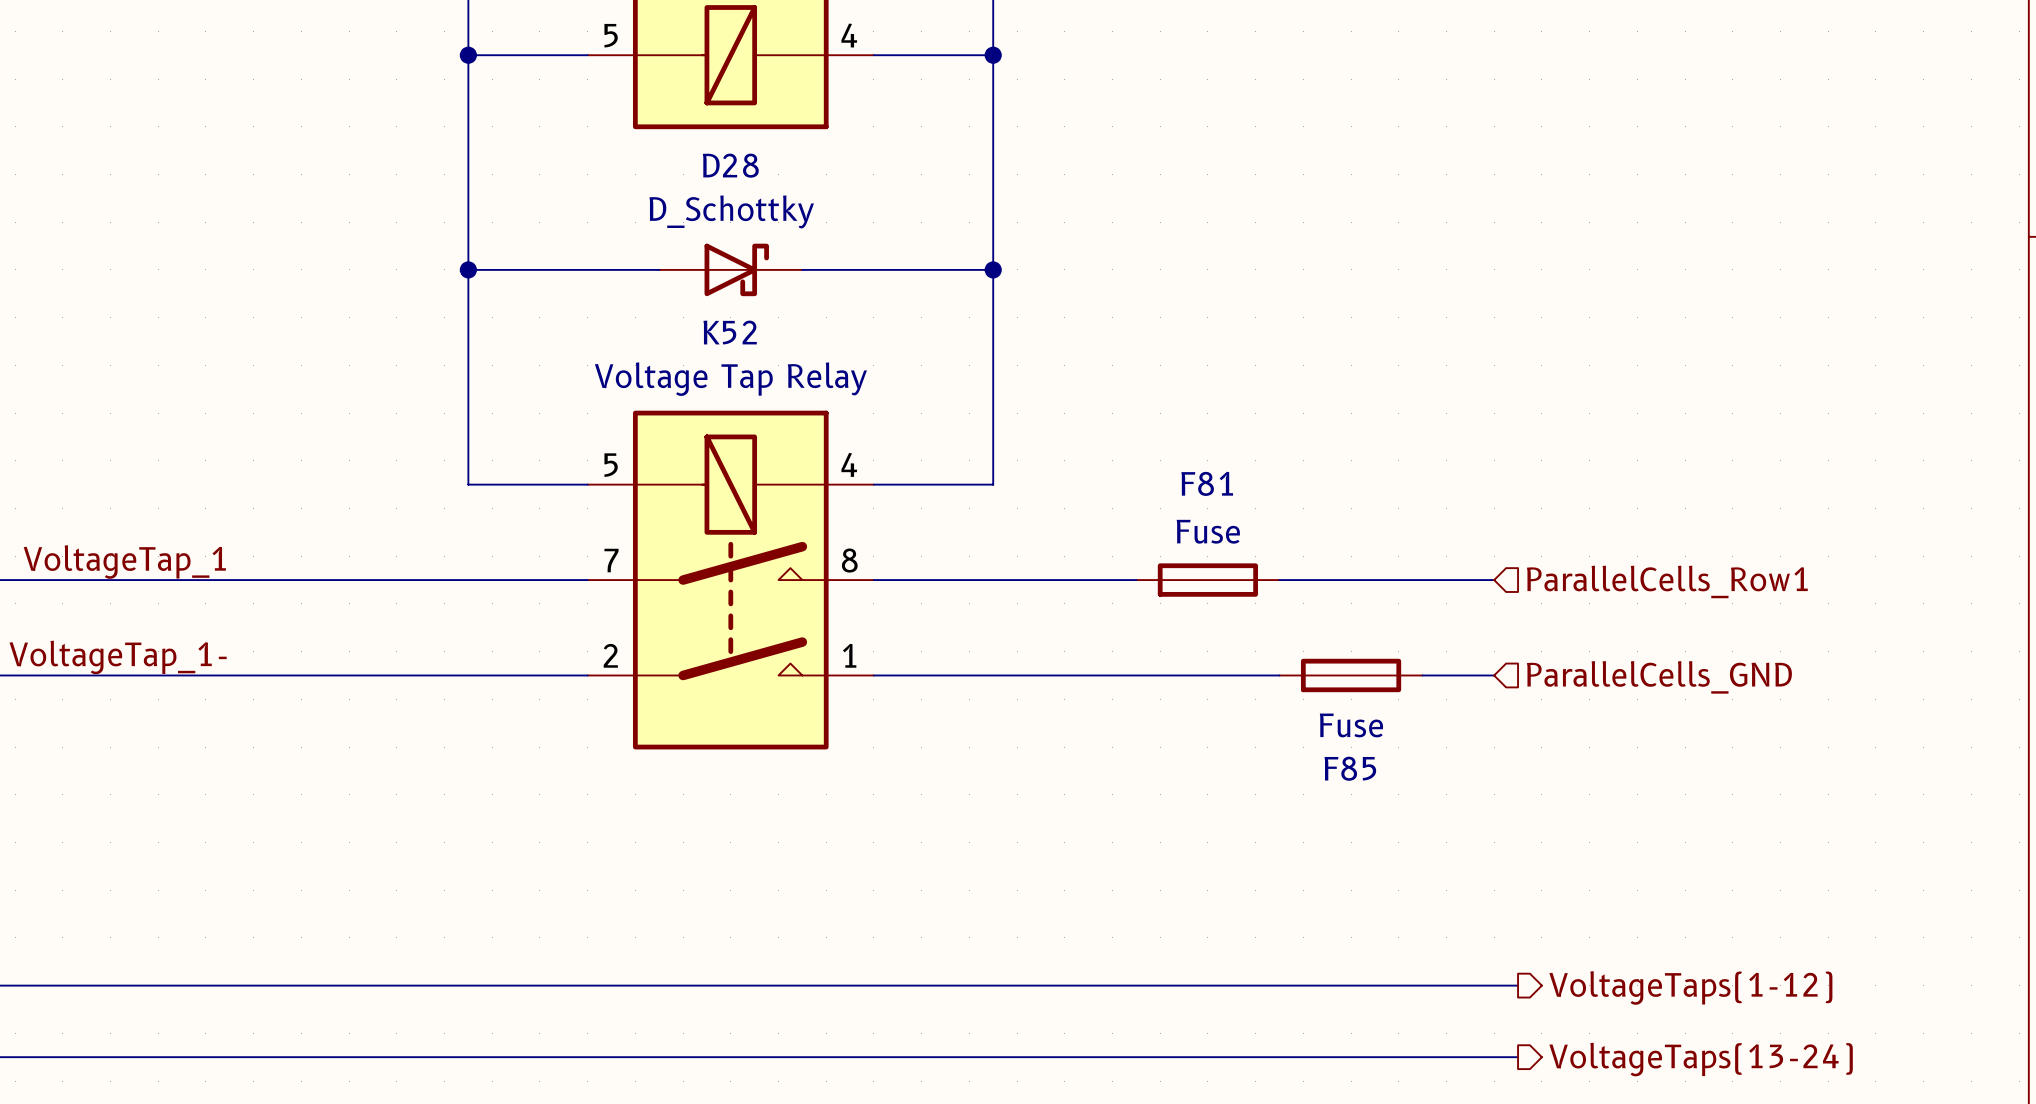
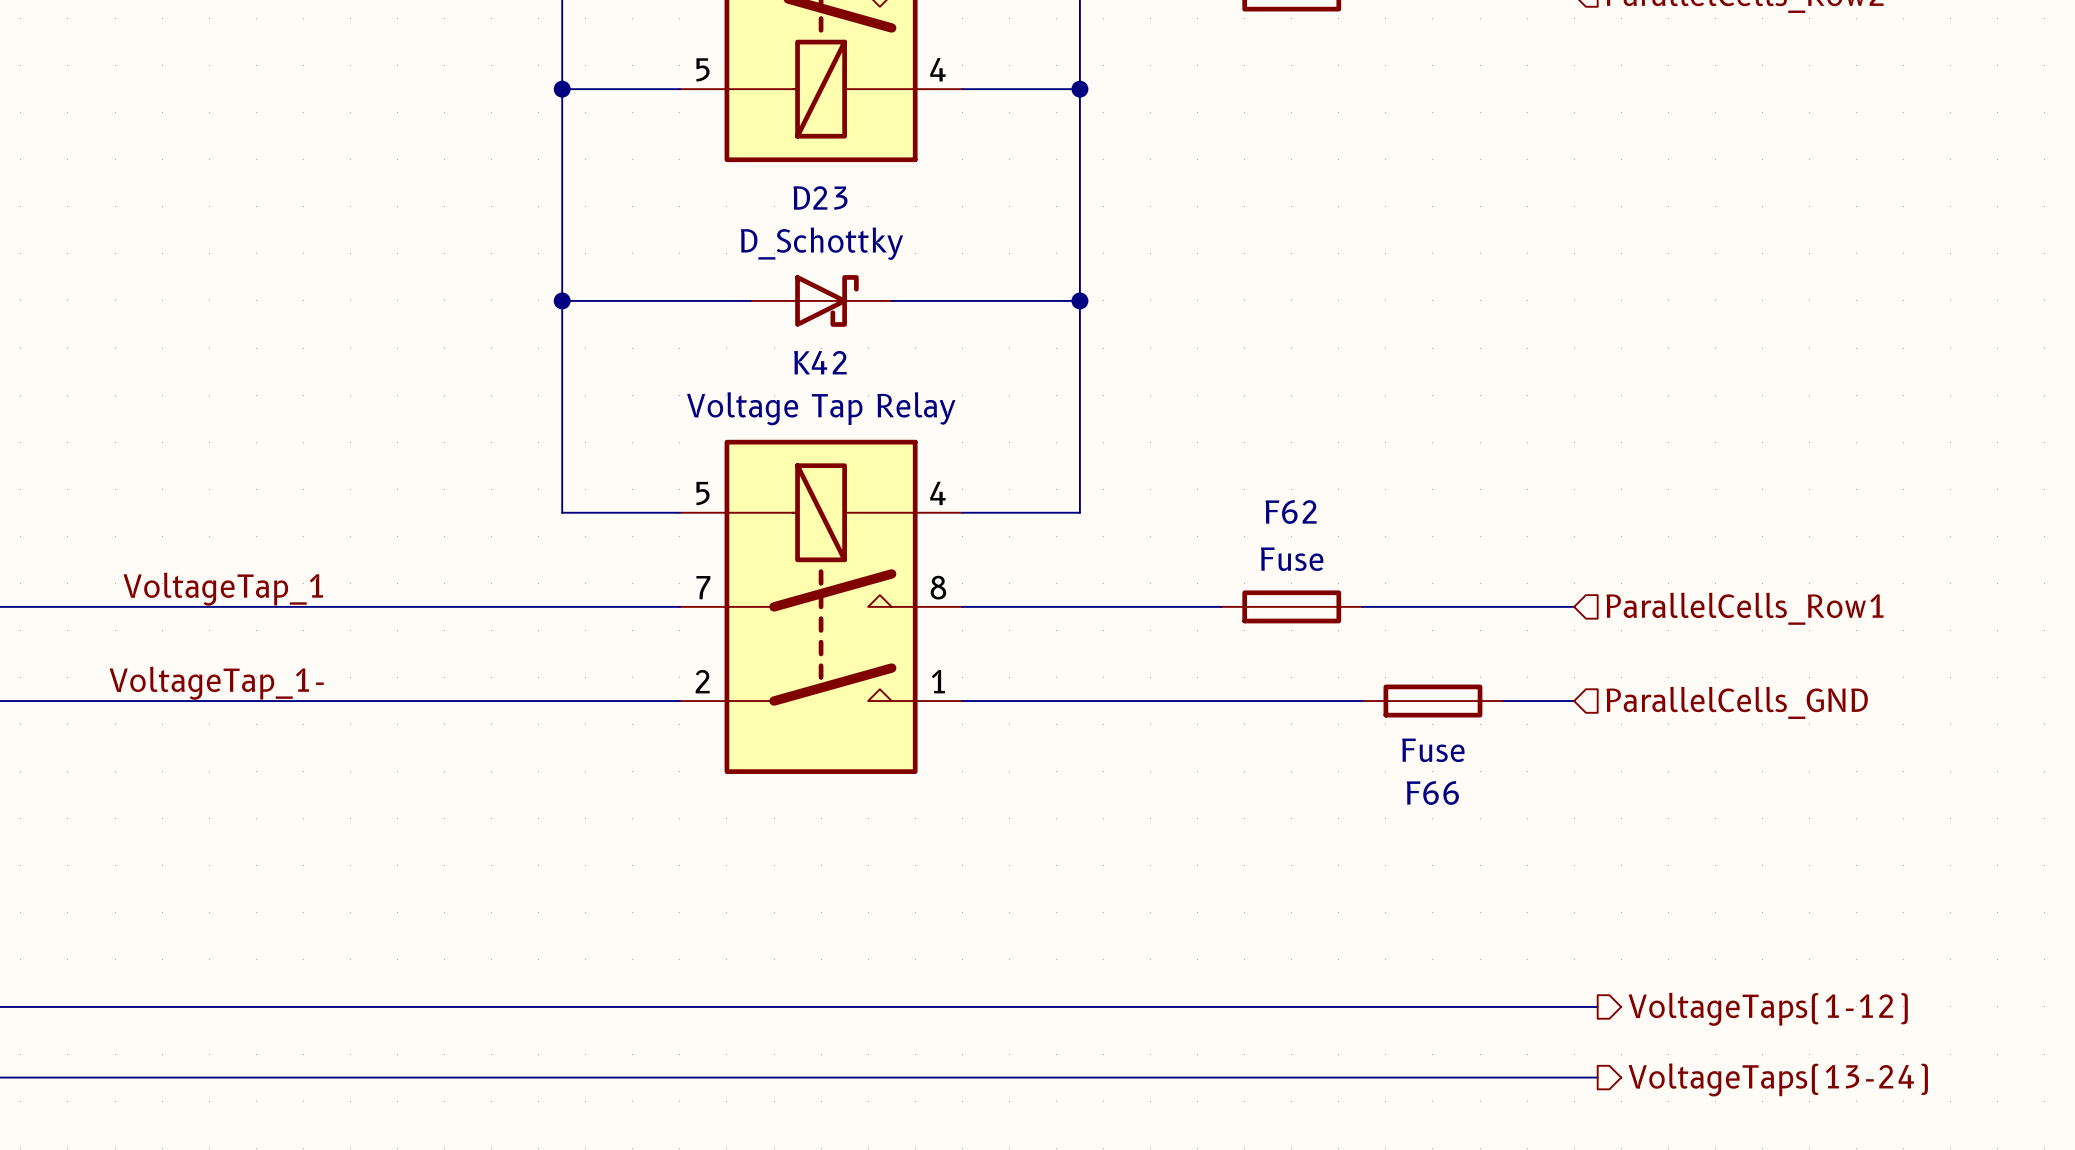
D28 name: D28 (730, 165) -> D23 (820, 197)
K52 name: K52 (730, 332) -> K42 (820, 362)
F81 name: F81 (1207, 483) -> F62 (1291, 512)
F85 name: F85 (1350, 768) -> F66 (1432, 793)

